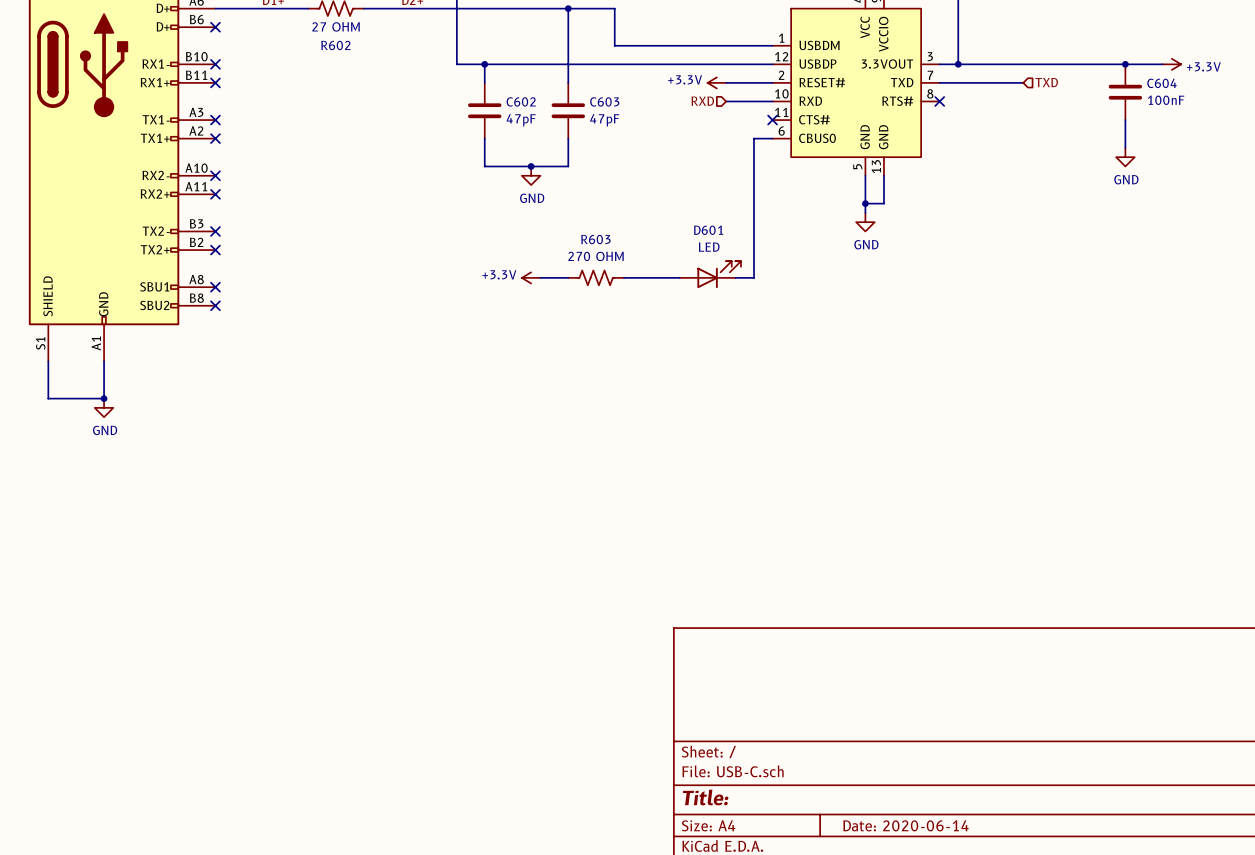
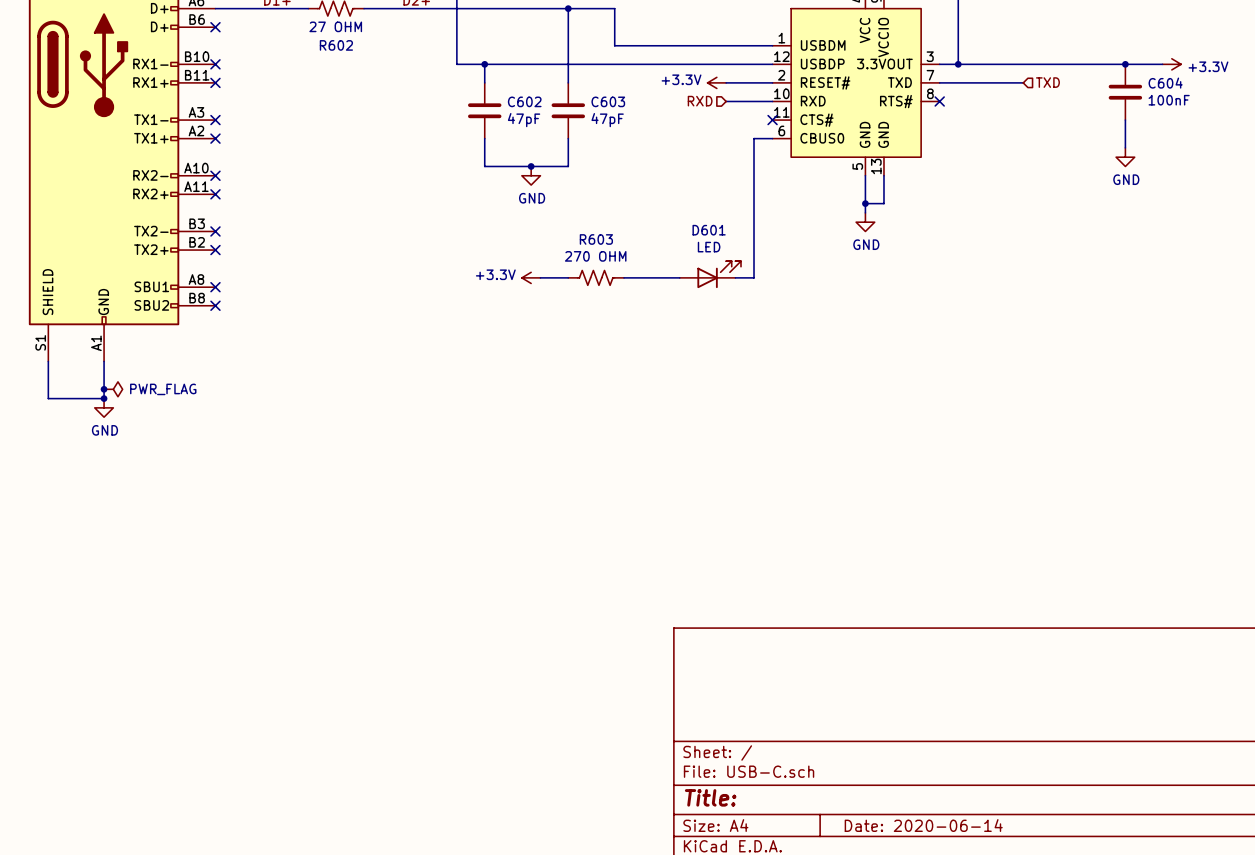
junction: none -> (104, 389)
power symbol: none -> PWR_FLAG (113, 389)

